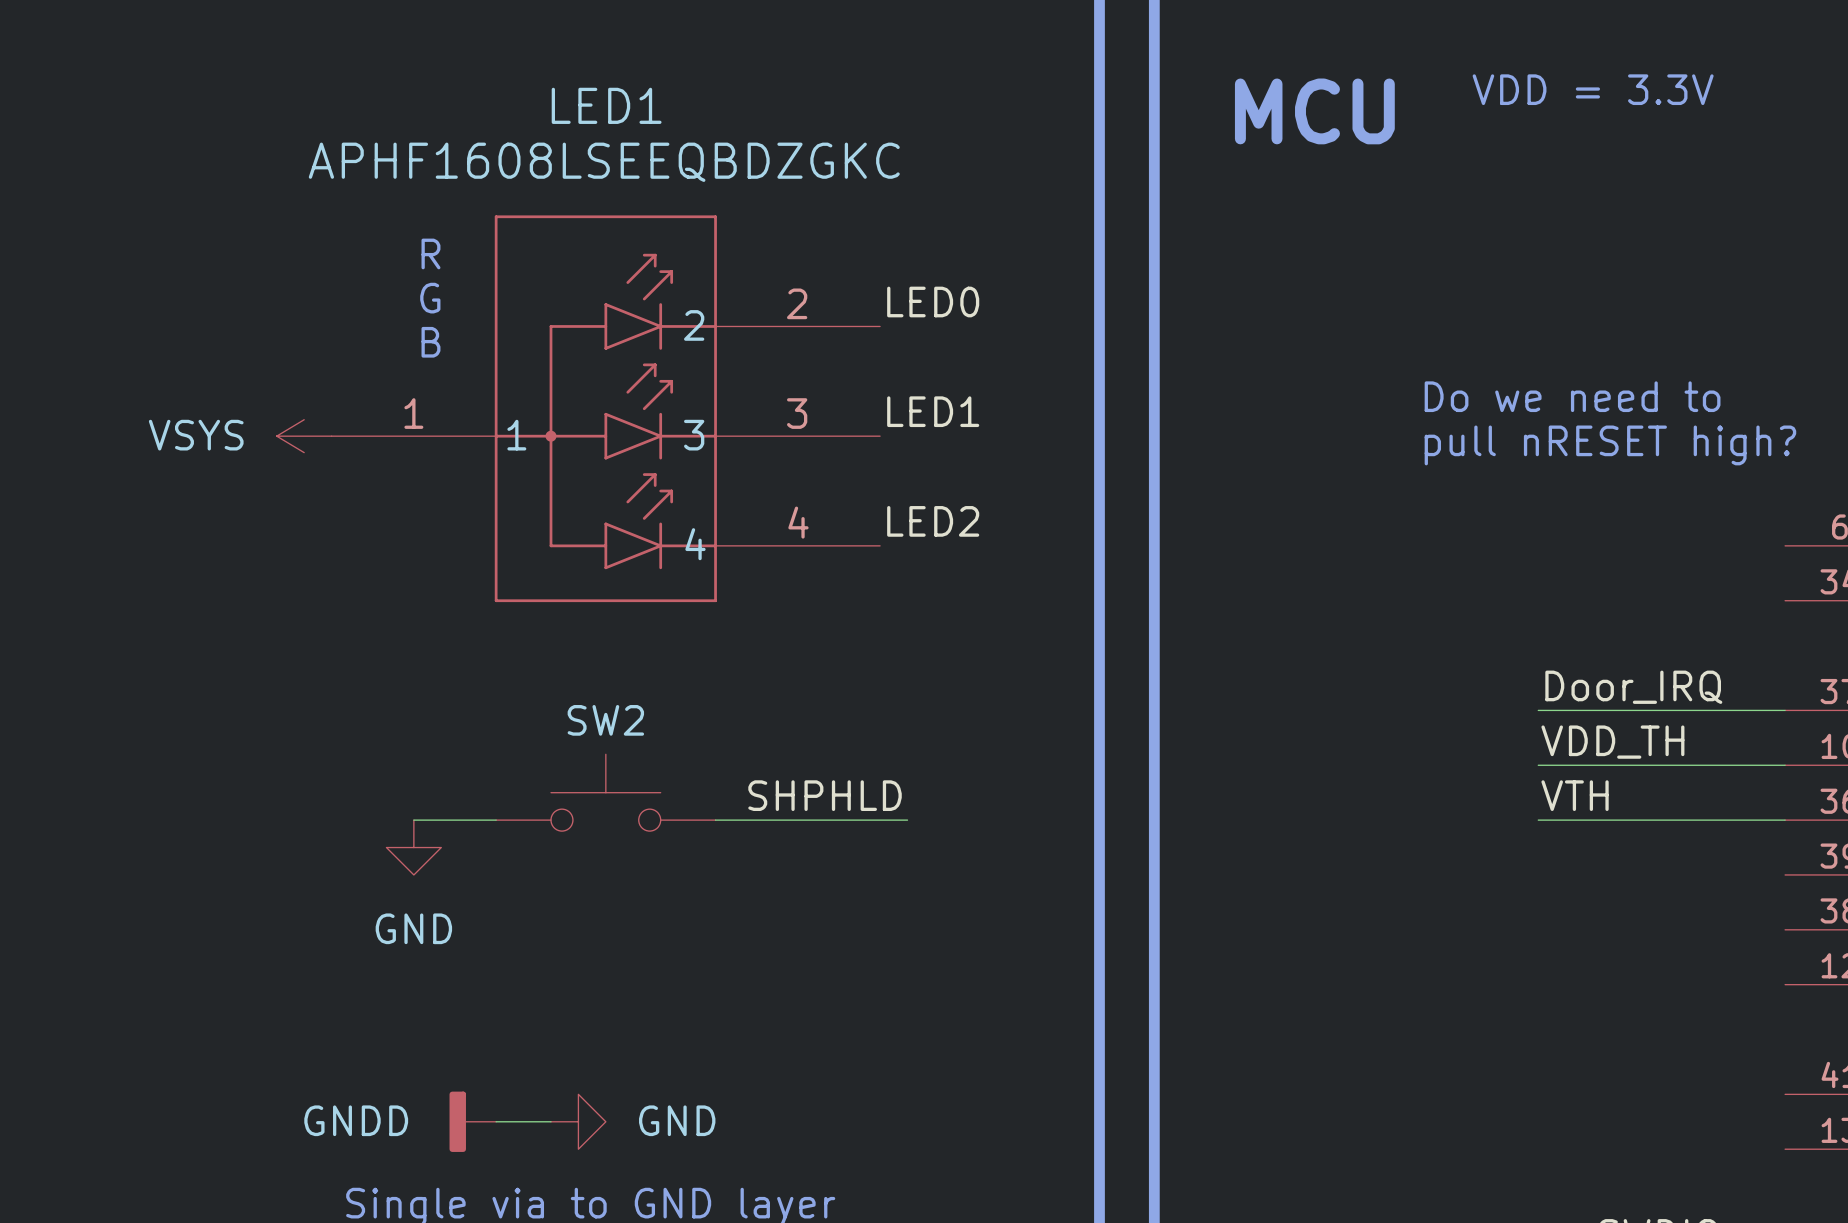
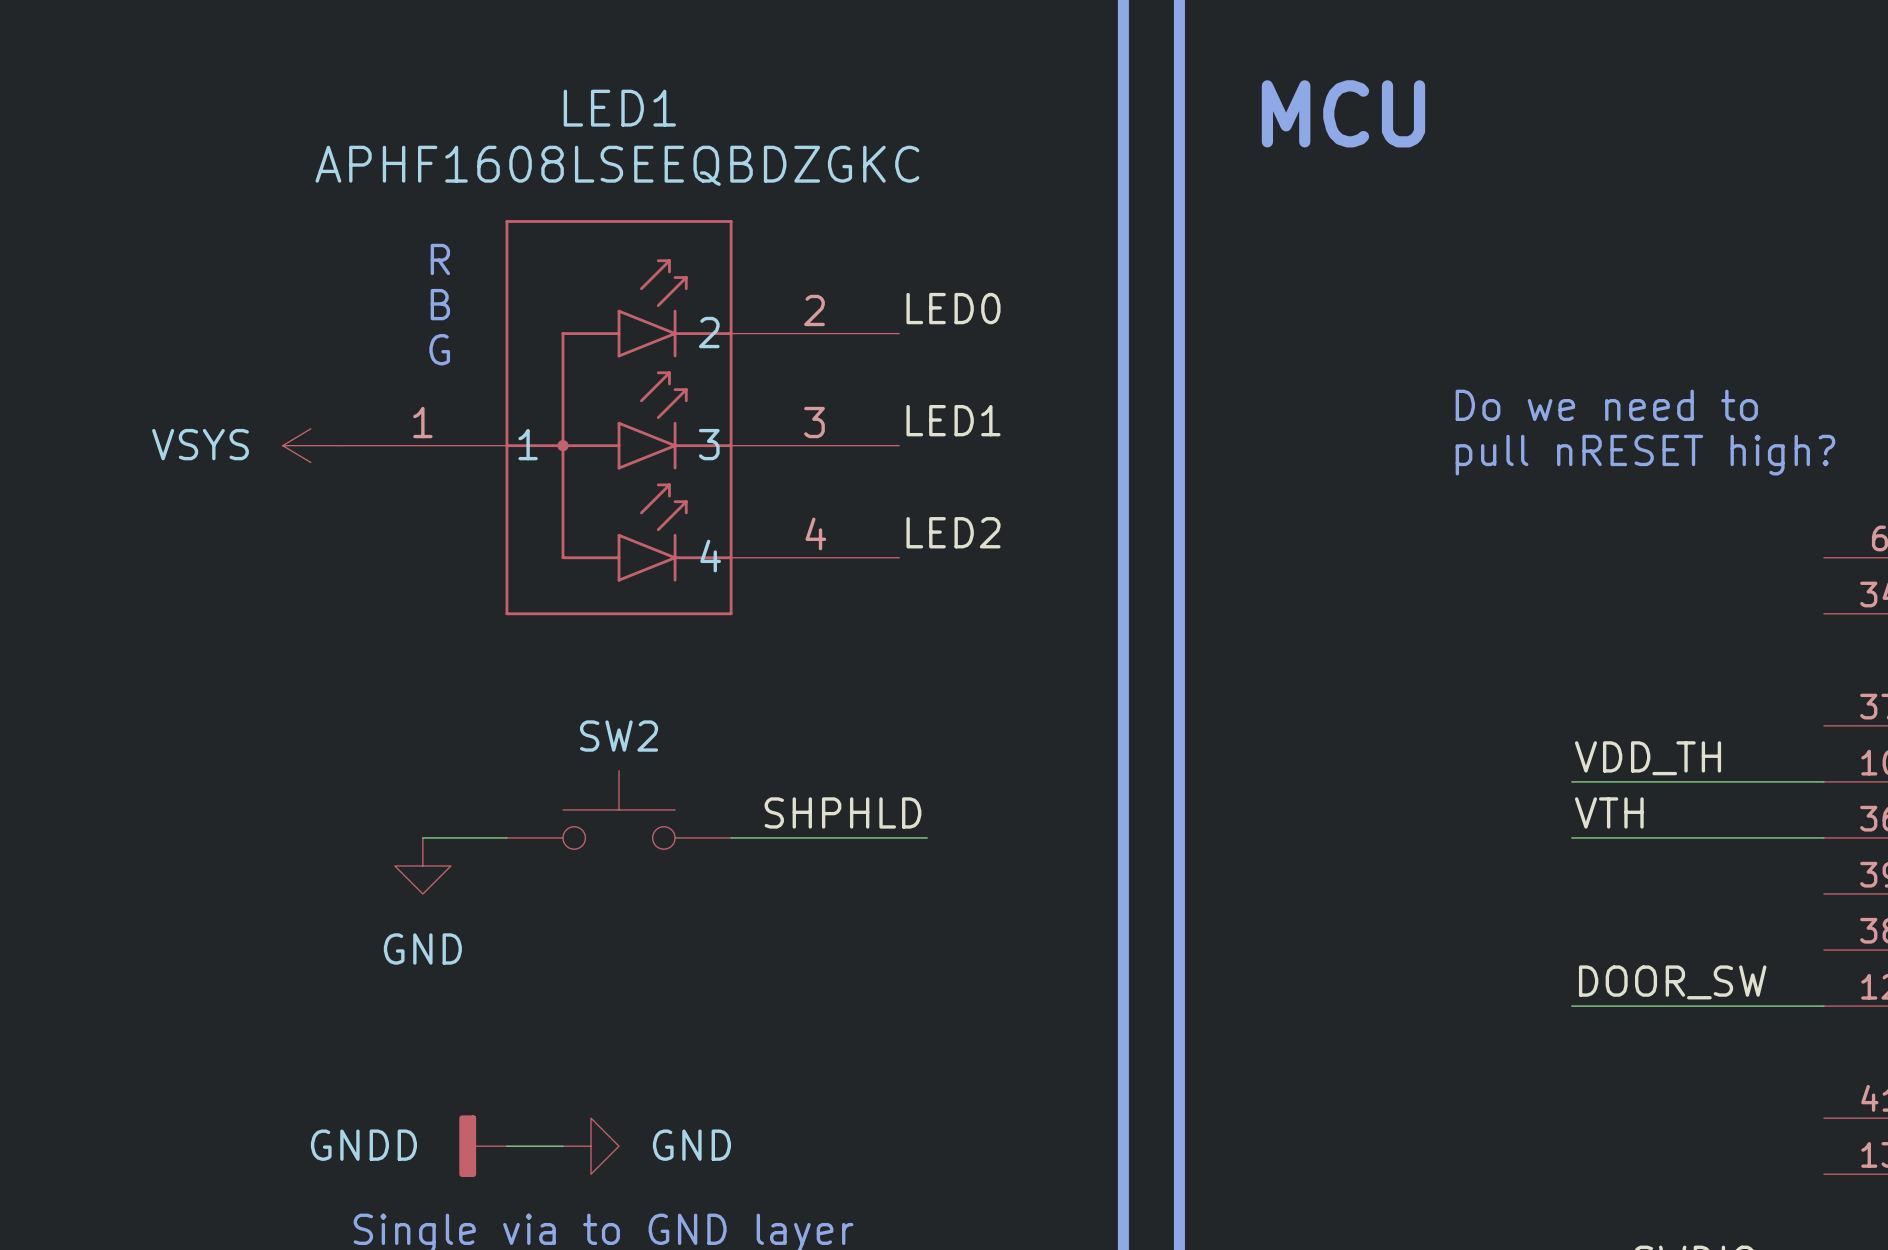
text: VDD = 3.3V (1593, 89) -> none
text: G (430, 298) -> B (440, 304)
text: B (430, 342) -> G (439, 349)
label: Door_IRQ (1633, 687) -> none
wire: (1538, 710) (1785, 710) -> (1571, 1006) (1823, 1006)
label: none -> DOOR_SW (1672, 982)

